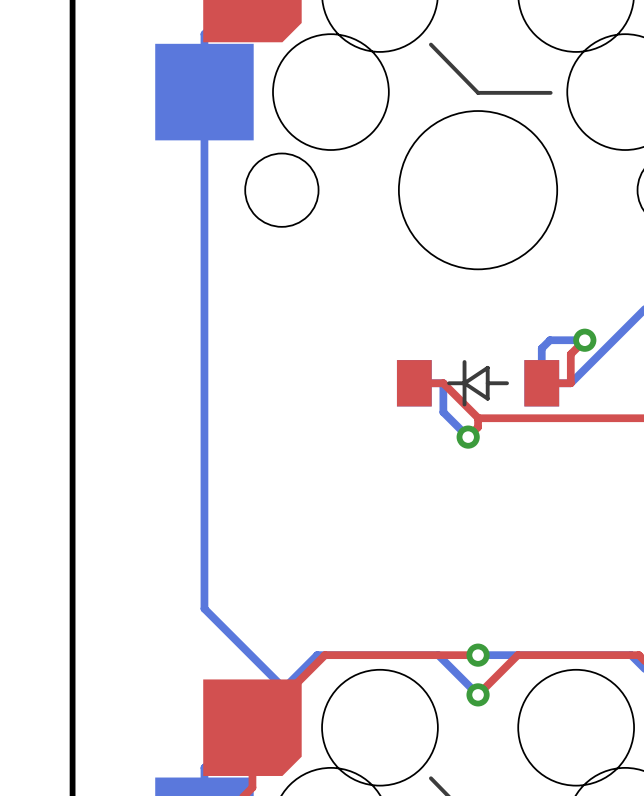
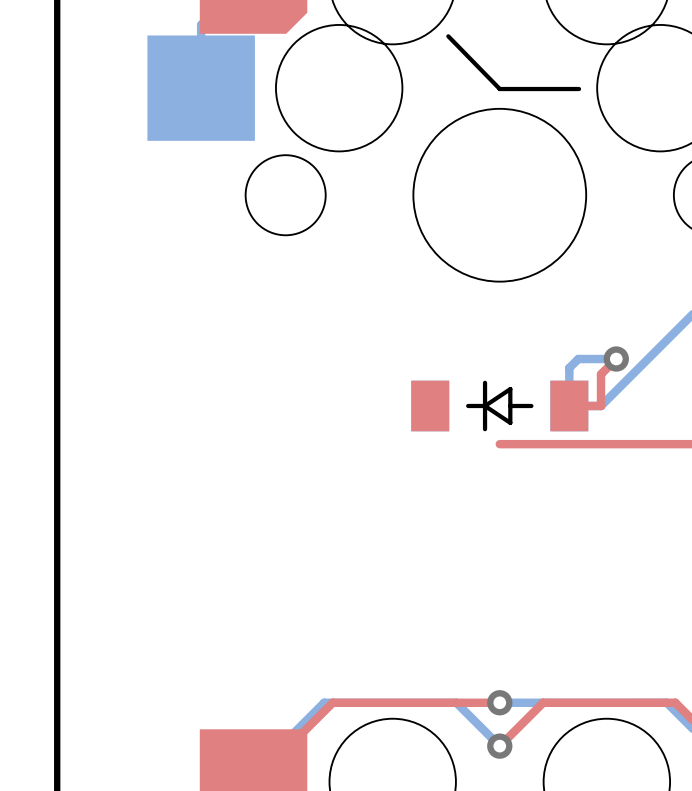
bottom track: (204, 92) (204, 608) (284, 688) -> none
top track: (414, 383) (443, 383) (478, 417) (478, 427) (468, 437) -> none
bottom track: (414, 383) (443, 383) (443, 412) (468, 437) -> none
via: (468, 437) -> none

